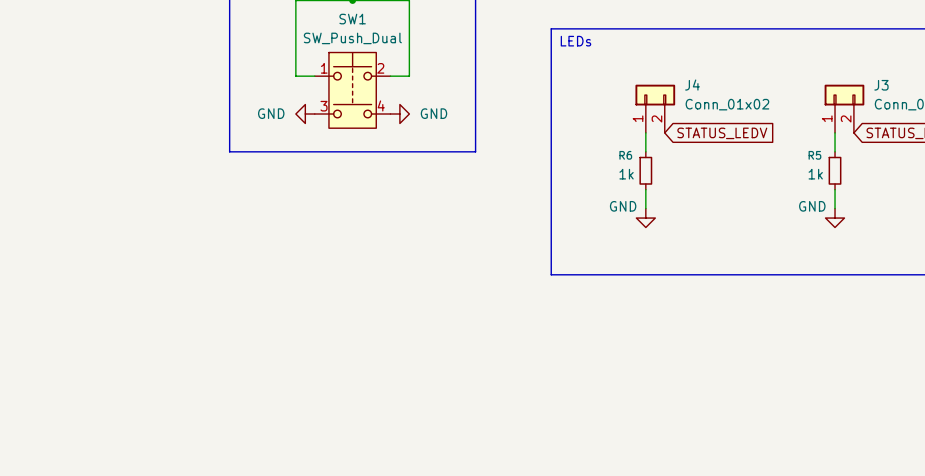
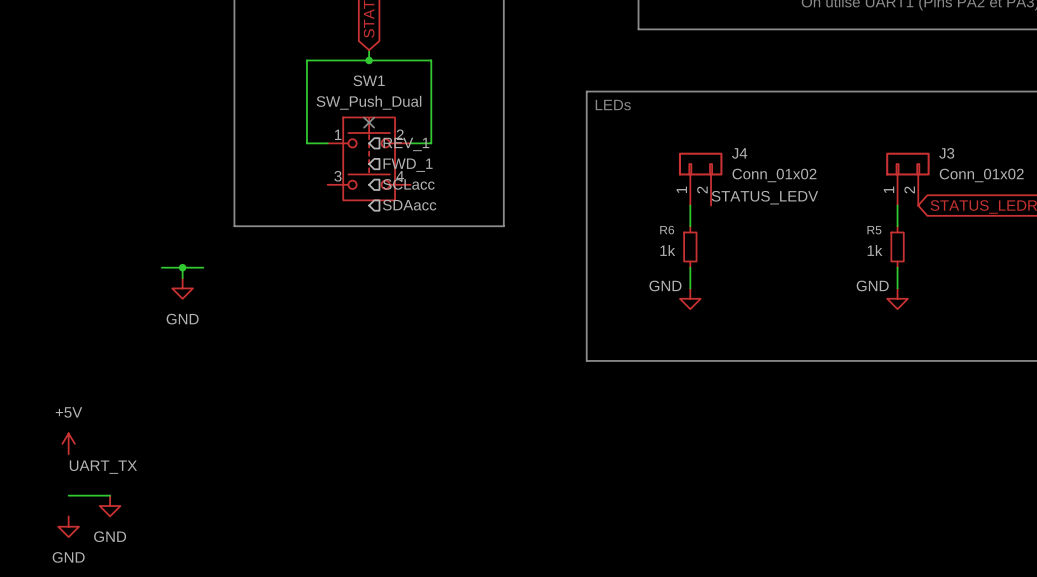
no-connect mark: none -> (369, 122)
hierarchical label: none -> REV_1 (406, 144)
hierarchical label: none -> FWD_1 (408, 165)
hierarchical label: none -> SCLacc (408, 184)
power symbol: GND (305, 114) -> none
power symbol: GND (399, 114) -> none
label: none -> STATUS_LEDV (764, 197)
hierarchical label: none -> SDAacc (409, 205)
global label: STATUS_LEDV (722, 133) -> none
wire: none -> (161, 267) (203, 267)
wire: none -> (182, 267) (182, 278)
junction: none -> (182, 267)
power symbol: none -> GND (182, 288)
power symbol: none -> +5V (68, 443)
label: none -> UART_TX (103, 467)
wire: none -> (68, 495) (110, 495)
power symbol: none -> GND (110, 506)
power symbol: none -> GND (68, 526)

